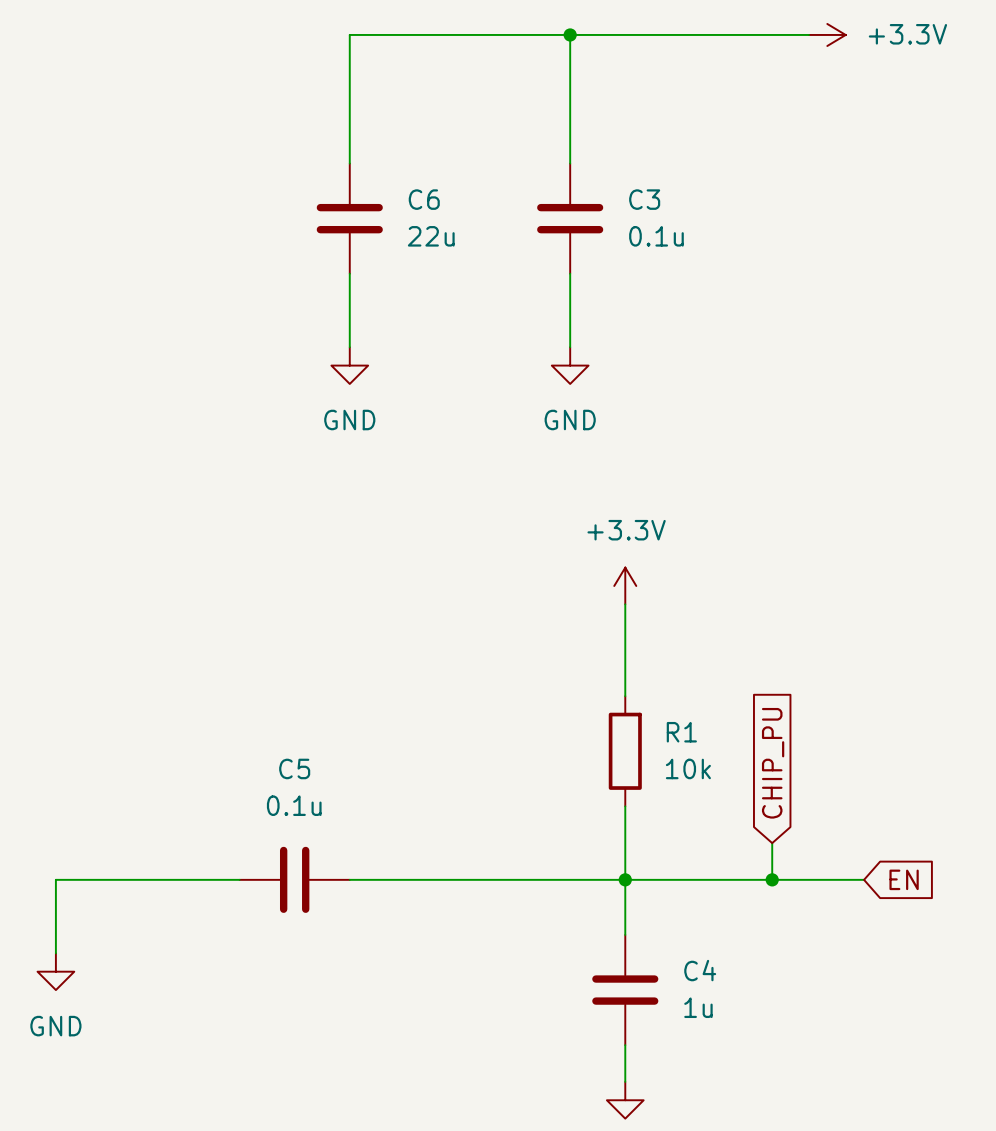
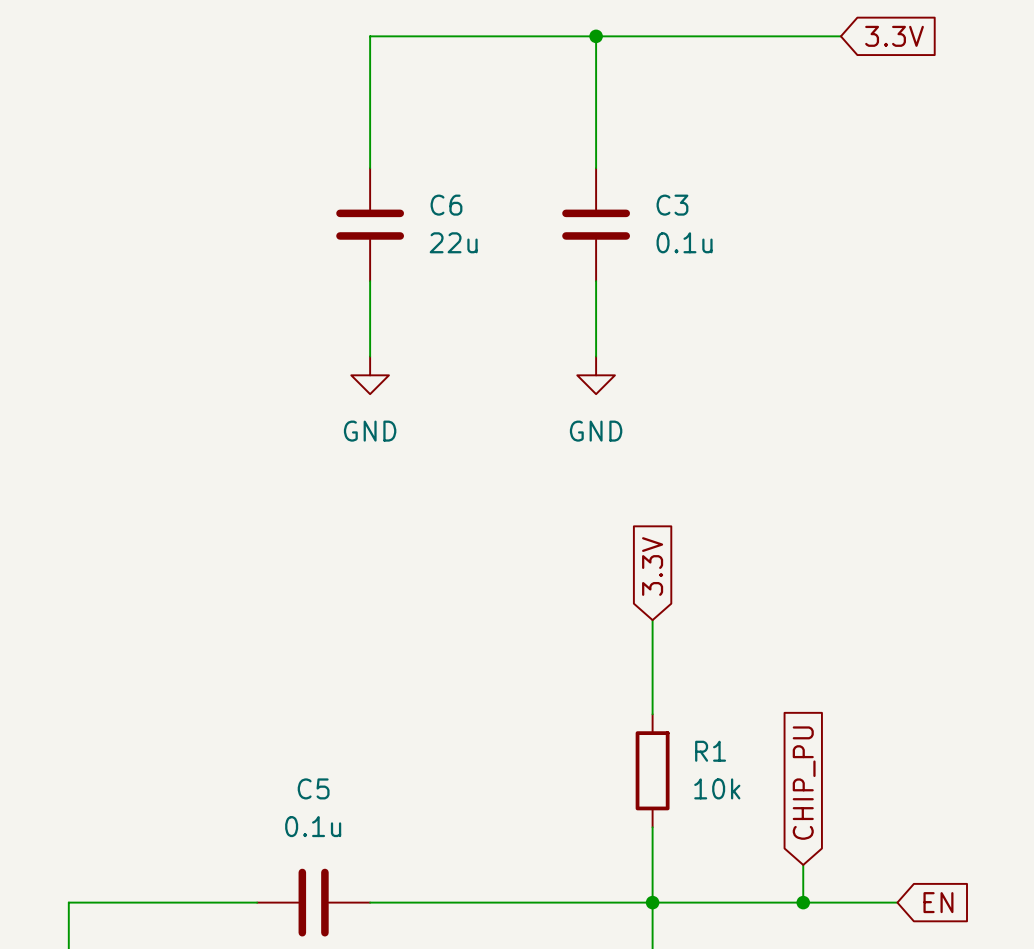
power symbol: +3.3V (827, 34) -> none
global label: none -> 3.3V (894, 36)
global label: none -> 3.3V (652, 566)
power symbol: +3.3V (625, 585) -> none

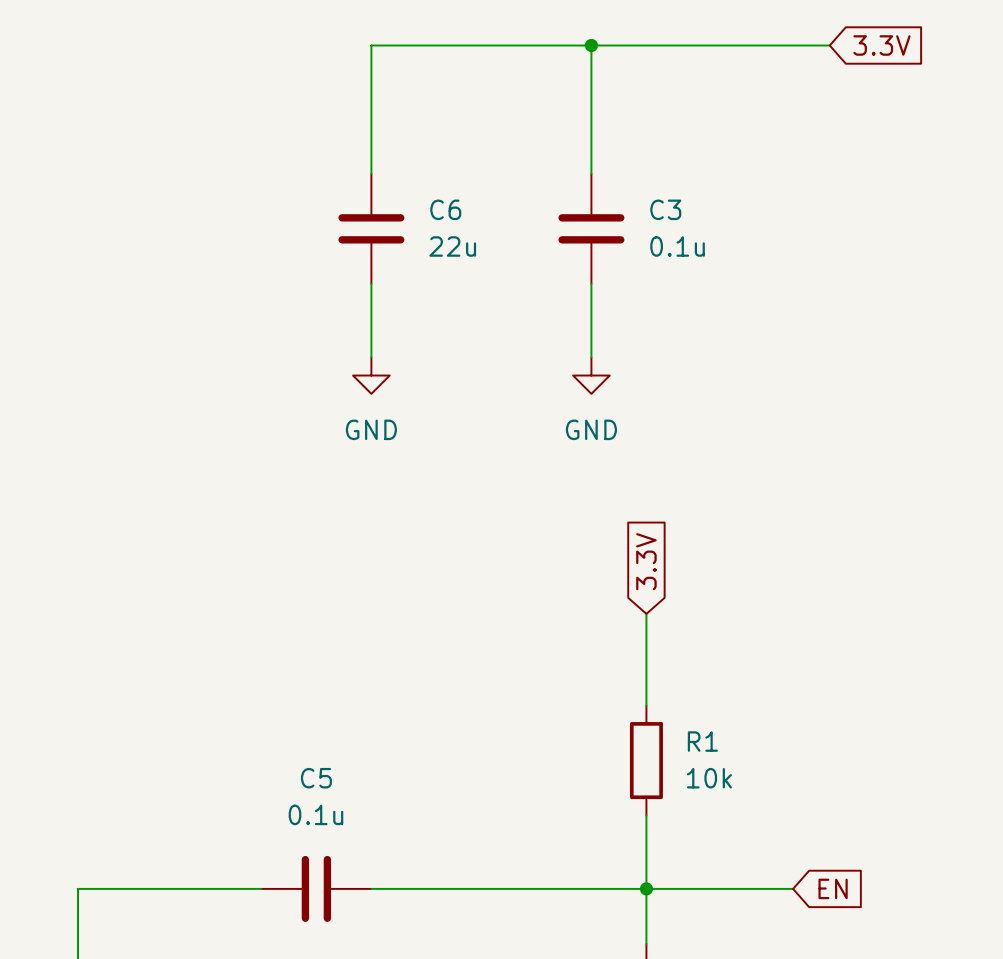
global label: CHIP_PU (804, 783) -> none
wire: (803, 864) (803, 902) (897, 902) -> none
junction: (803, 902) -> none
global label position: EN (938, 902) -> EN (833, 888)

